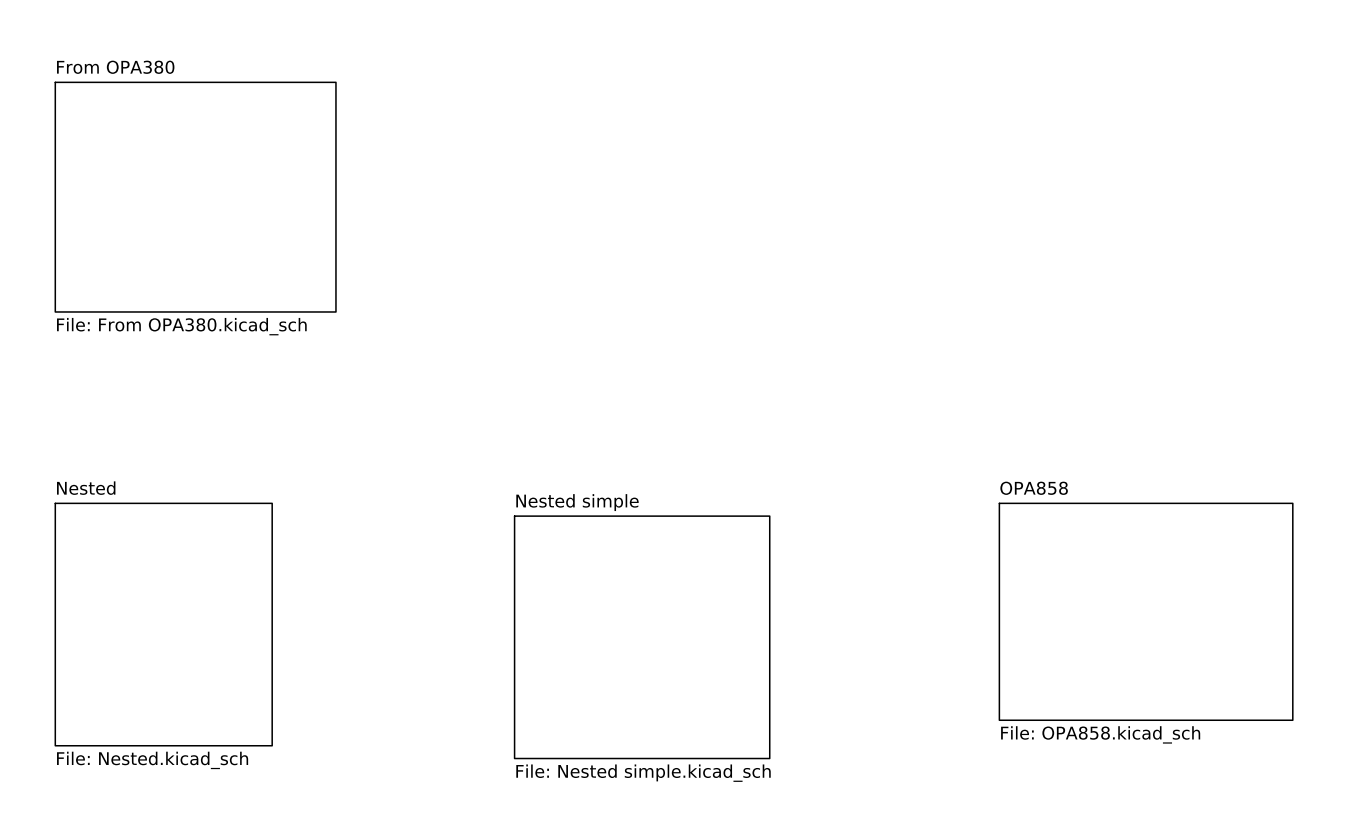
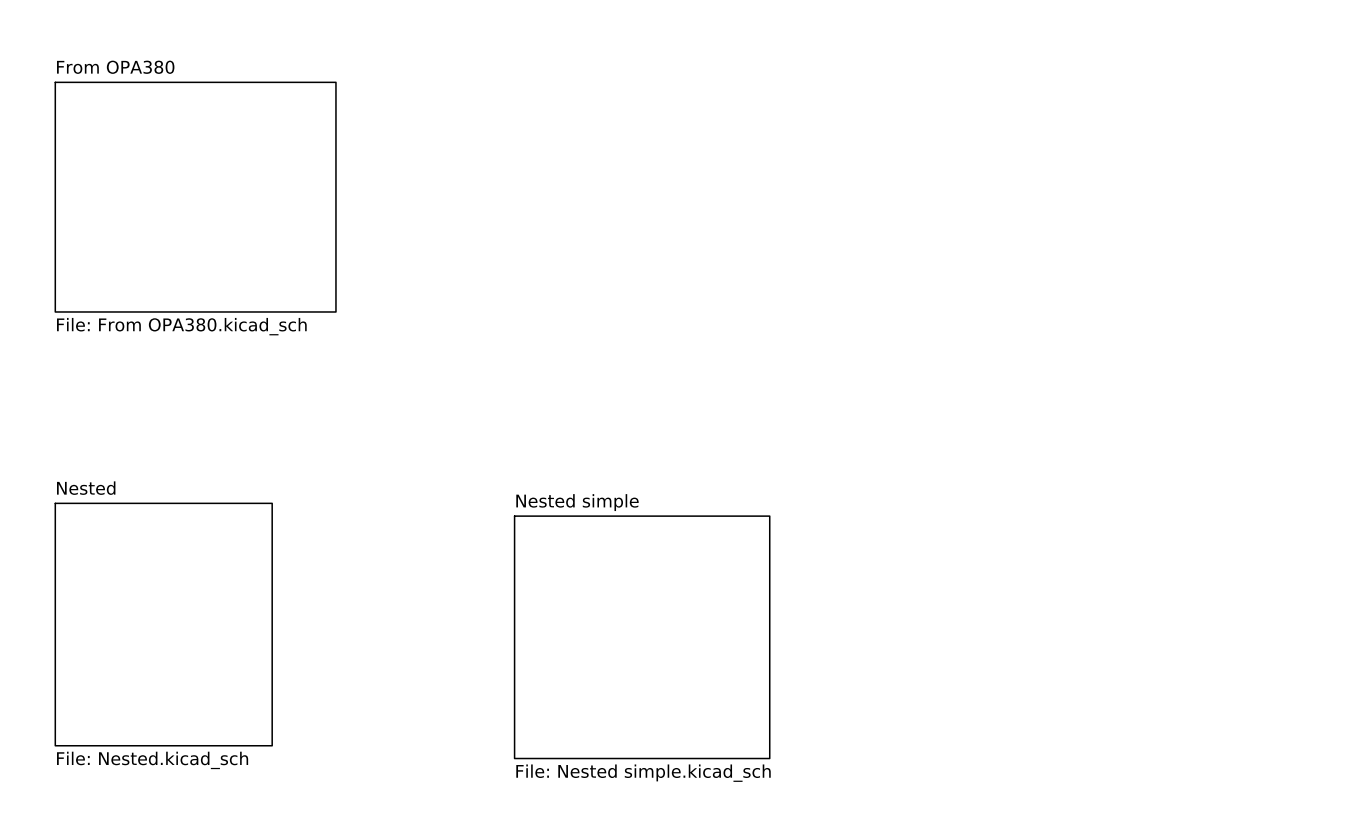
sheet OPA858: File: OPA858.kicad_sch (1146, 611) -> none

